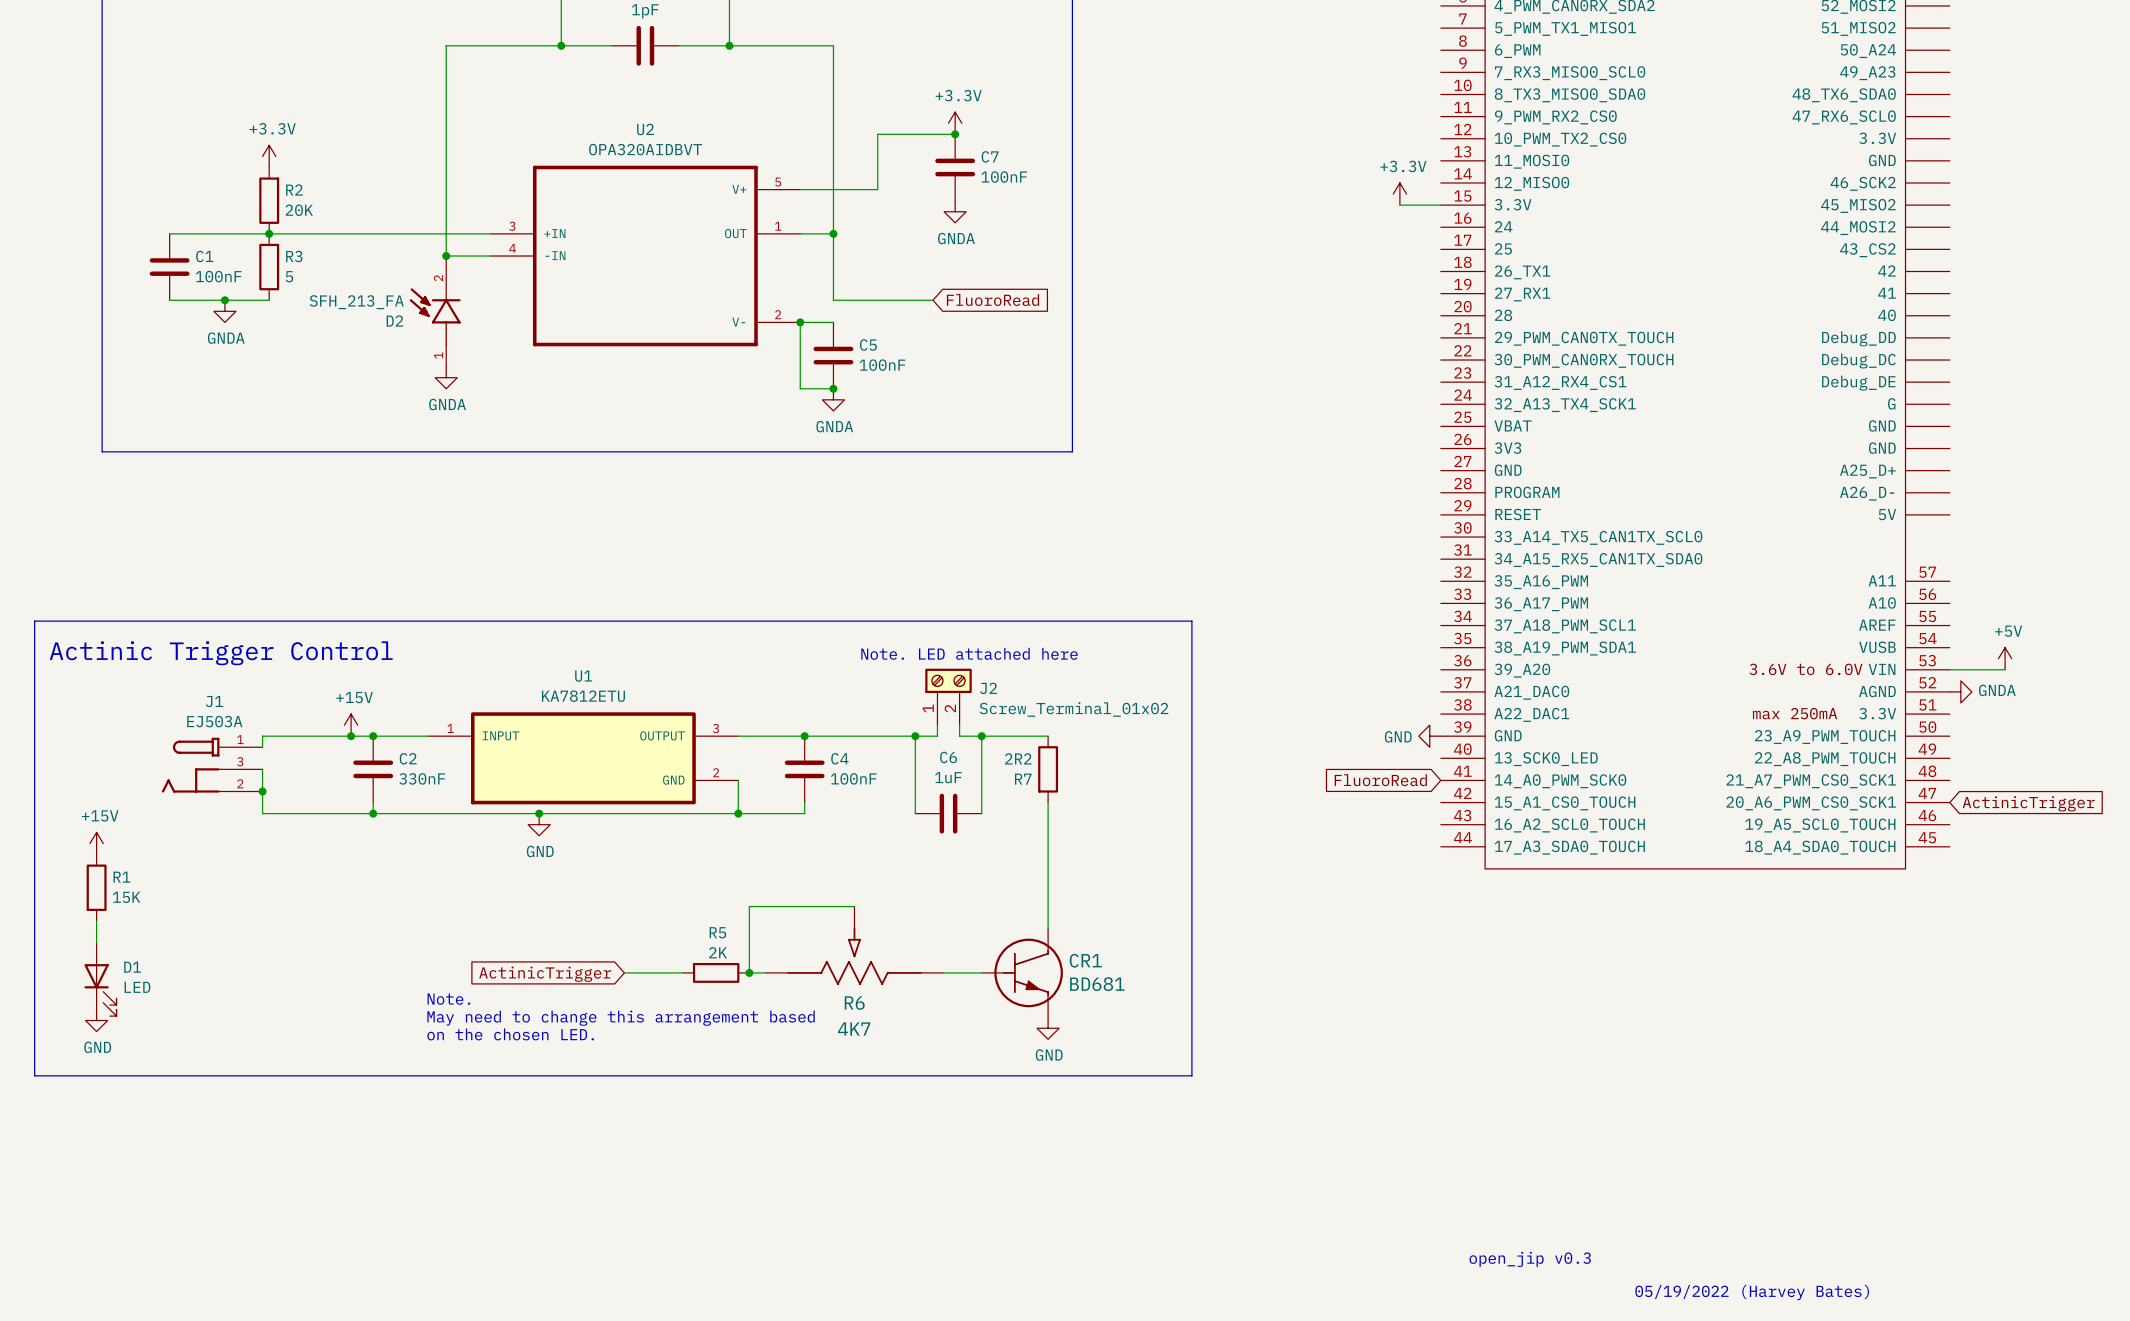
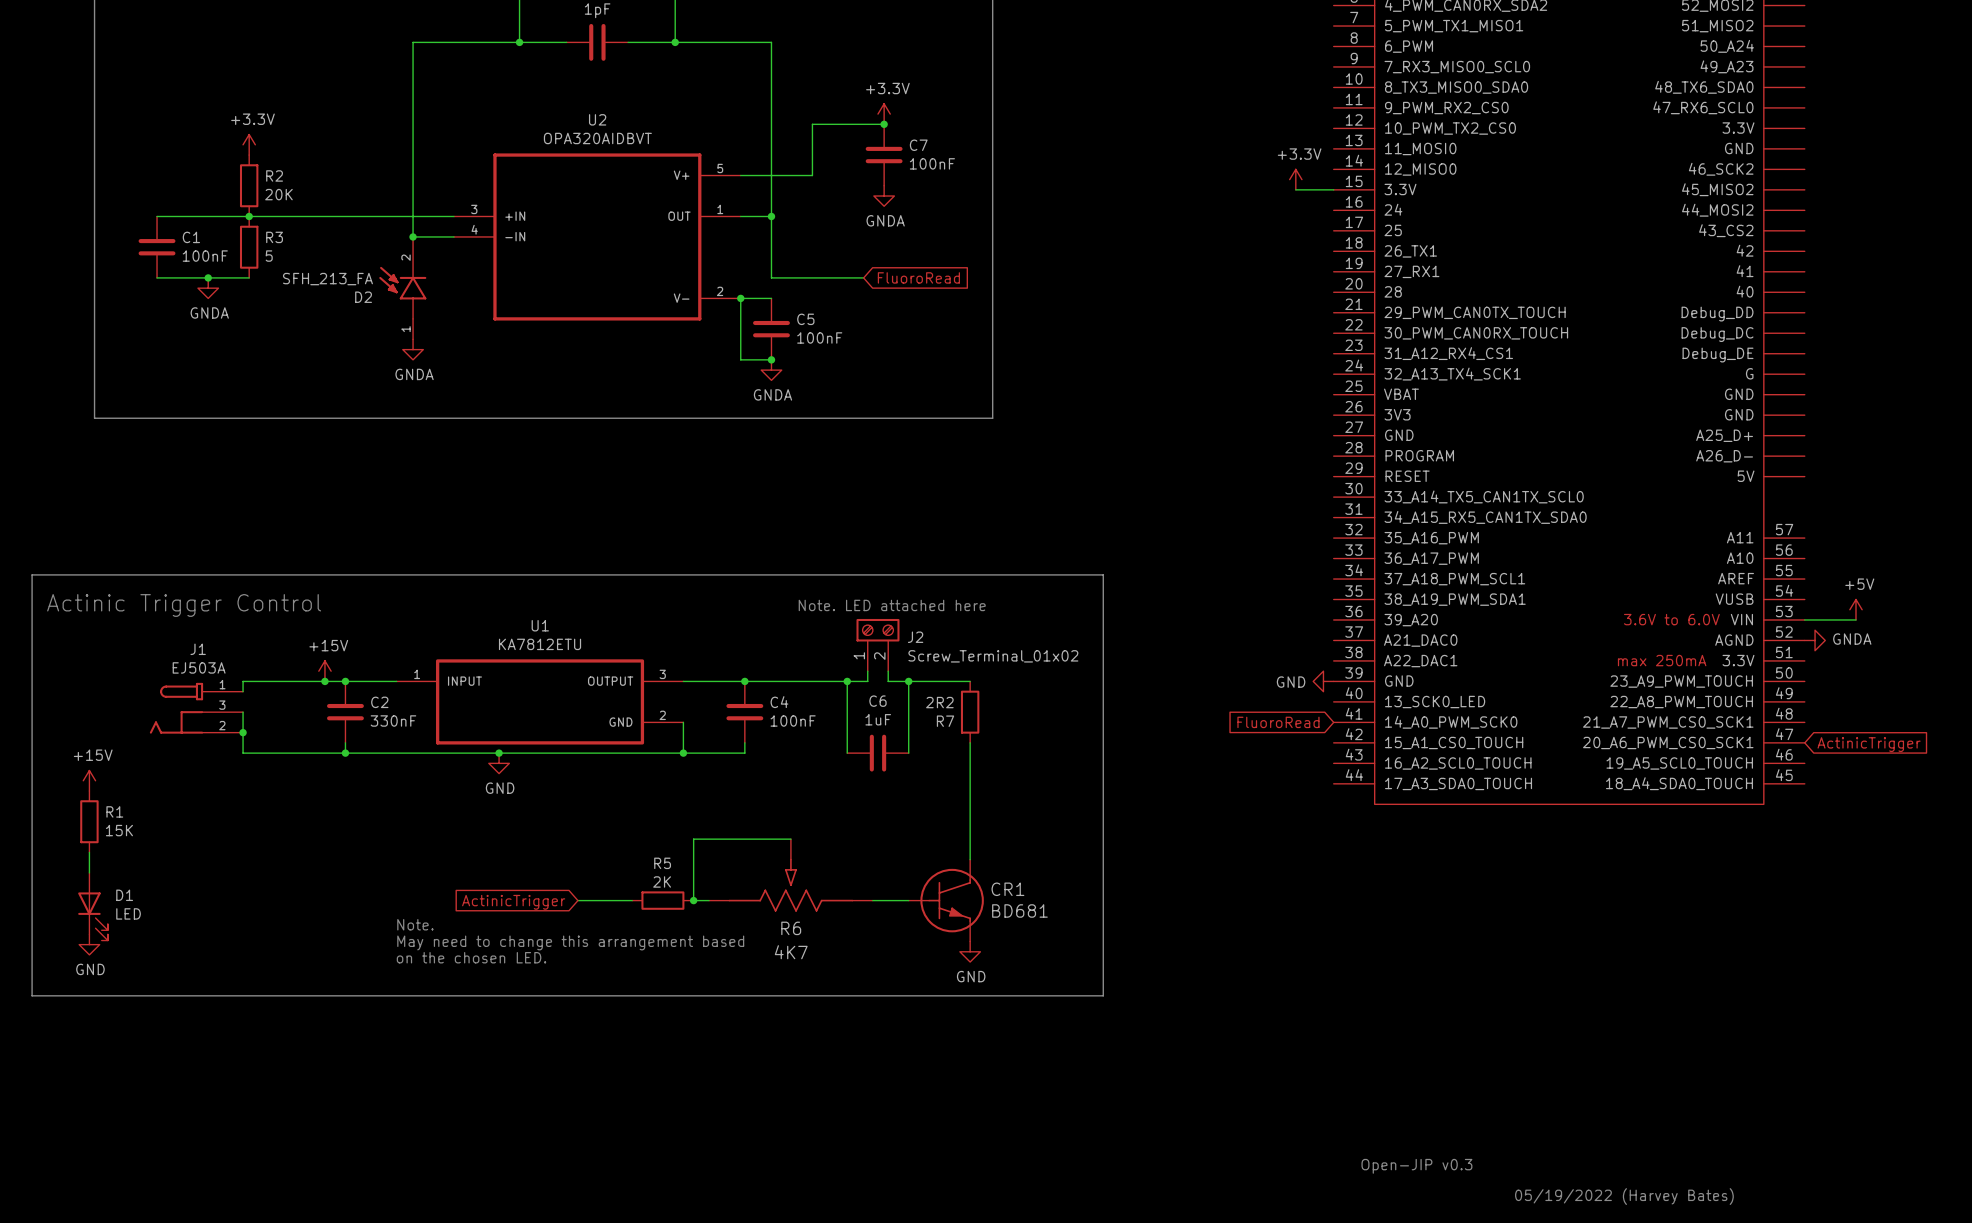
text: open_jip v0.3 (1530, 1259) -> Open-JIP v0.3 (1416, 1166)

